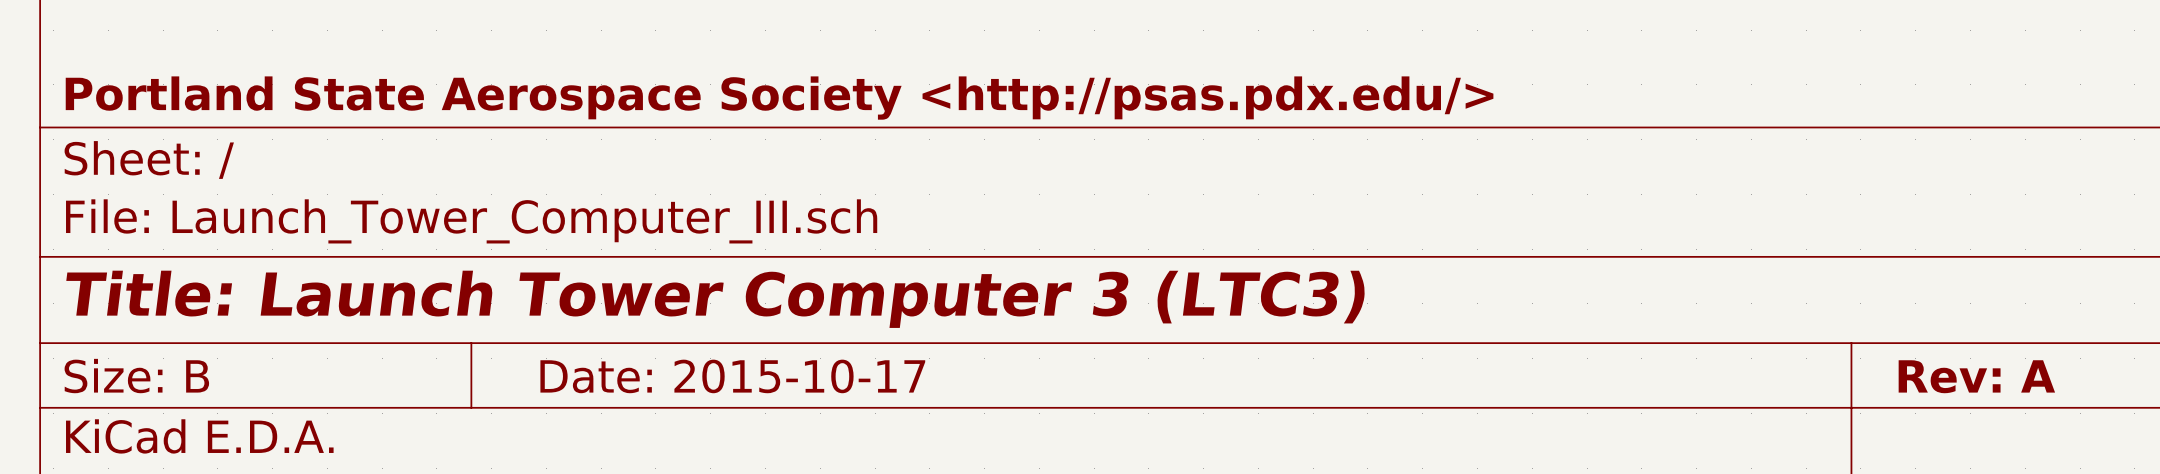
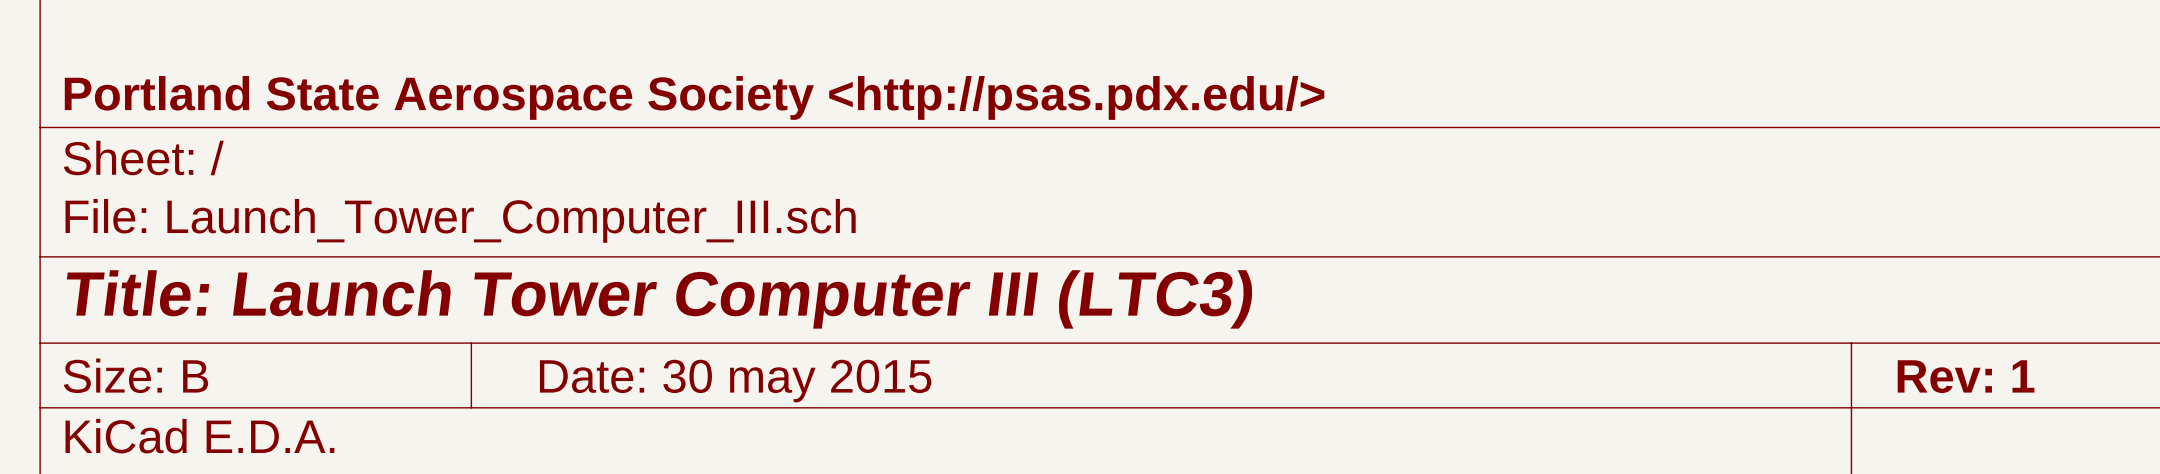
title block: Title: Launch Tower Computer 3 (LTC3) (715, 299) -> Title: Launch Tower Computer III (LTC3) (659, 299)
title block: Date: 2015-10-17 (732, 376) -> Date: 30 may 2015 (735, 381)
title block: Rev: A (1976, 376) -> Rev: 1 (1966, 376)

